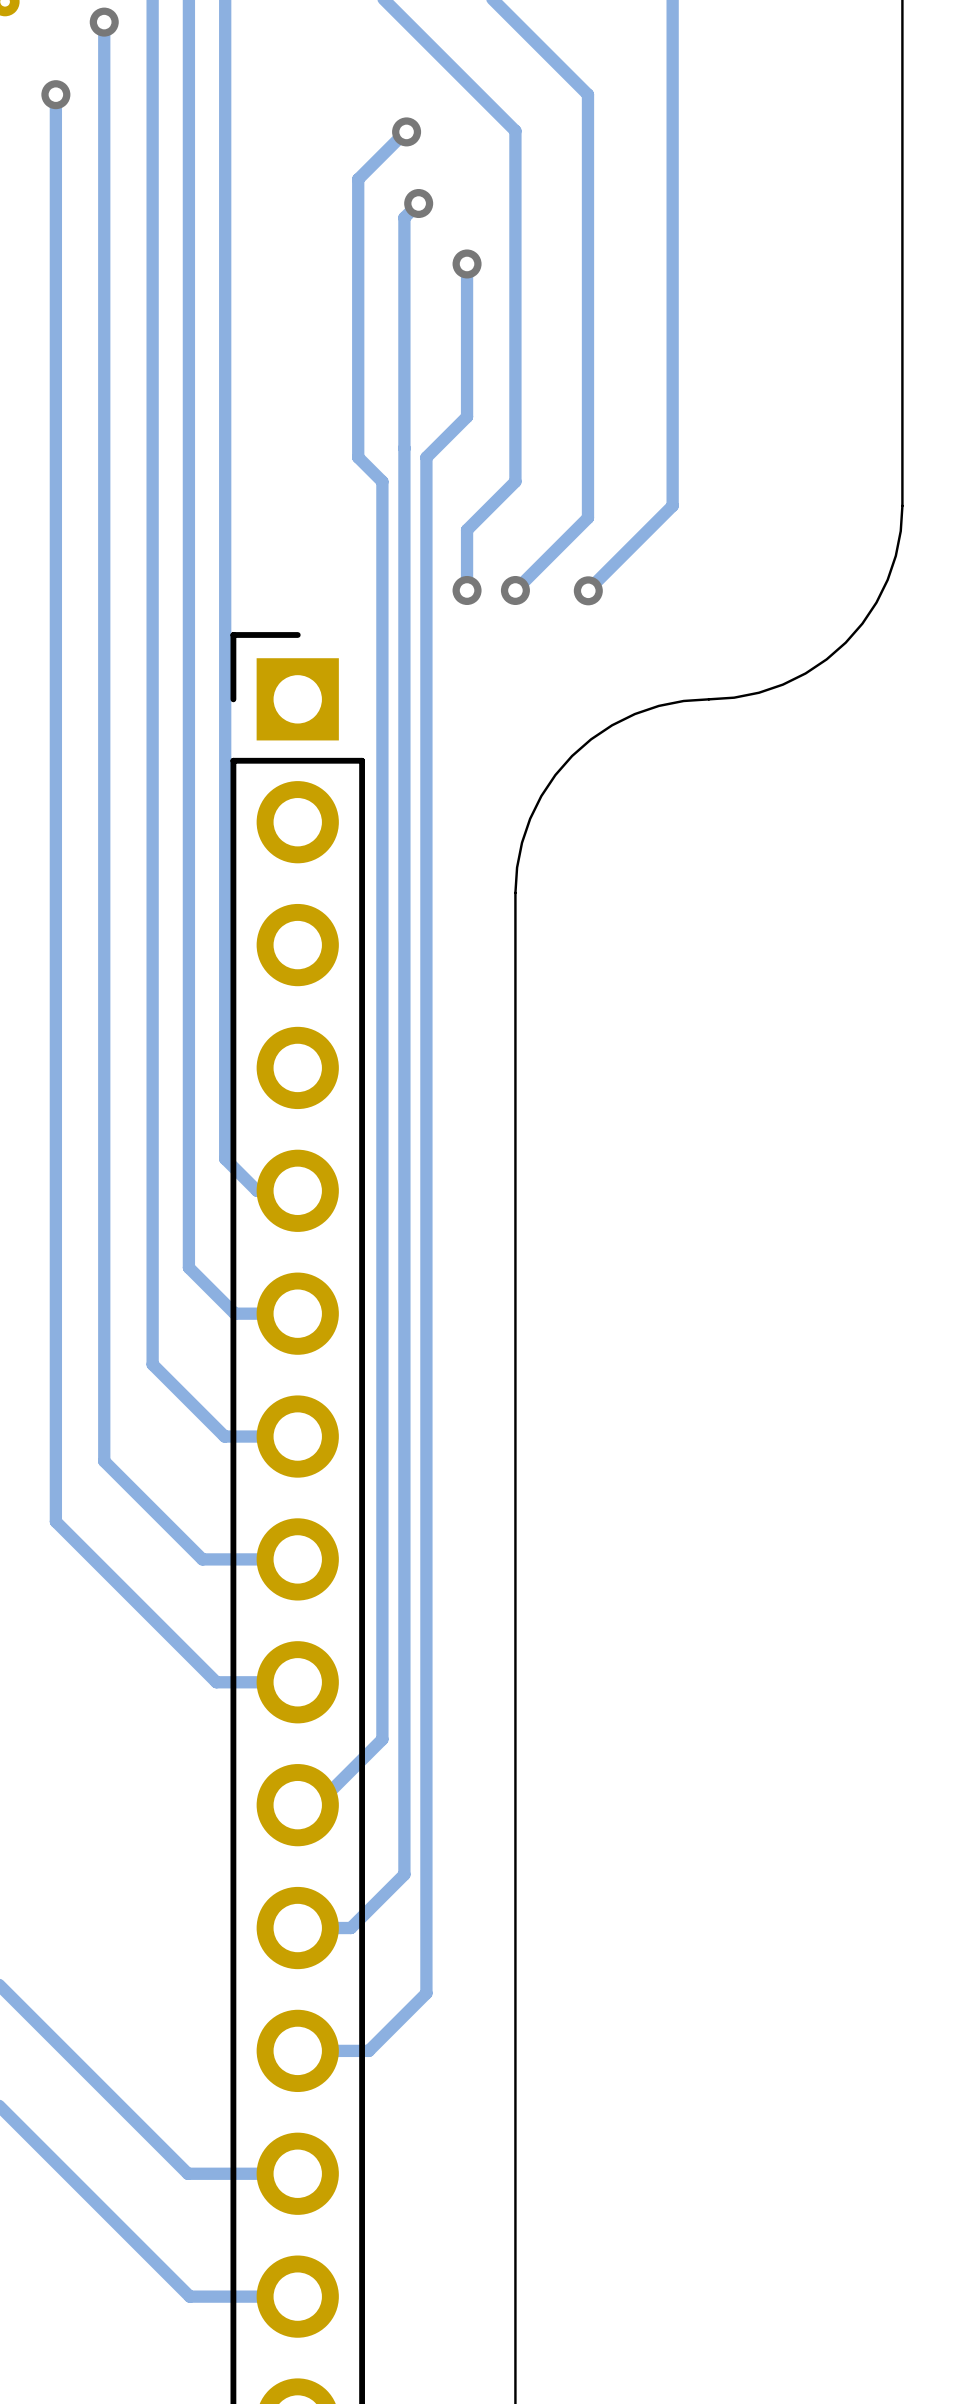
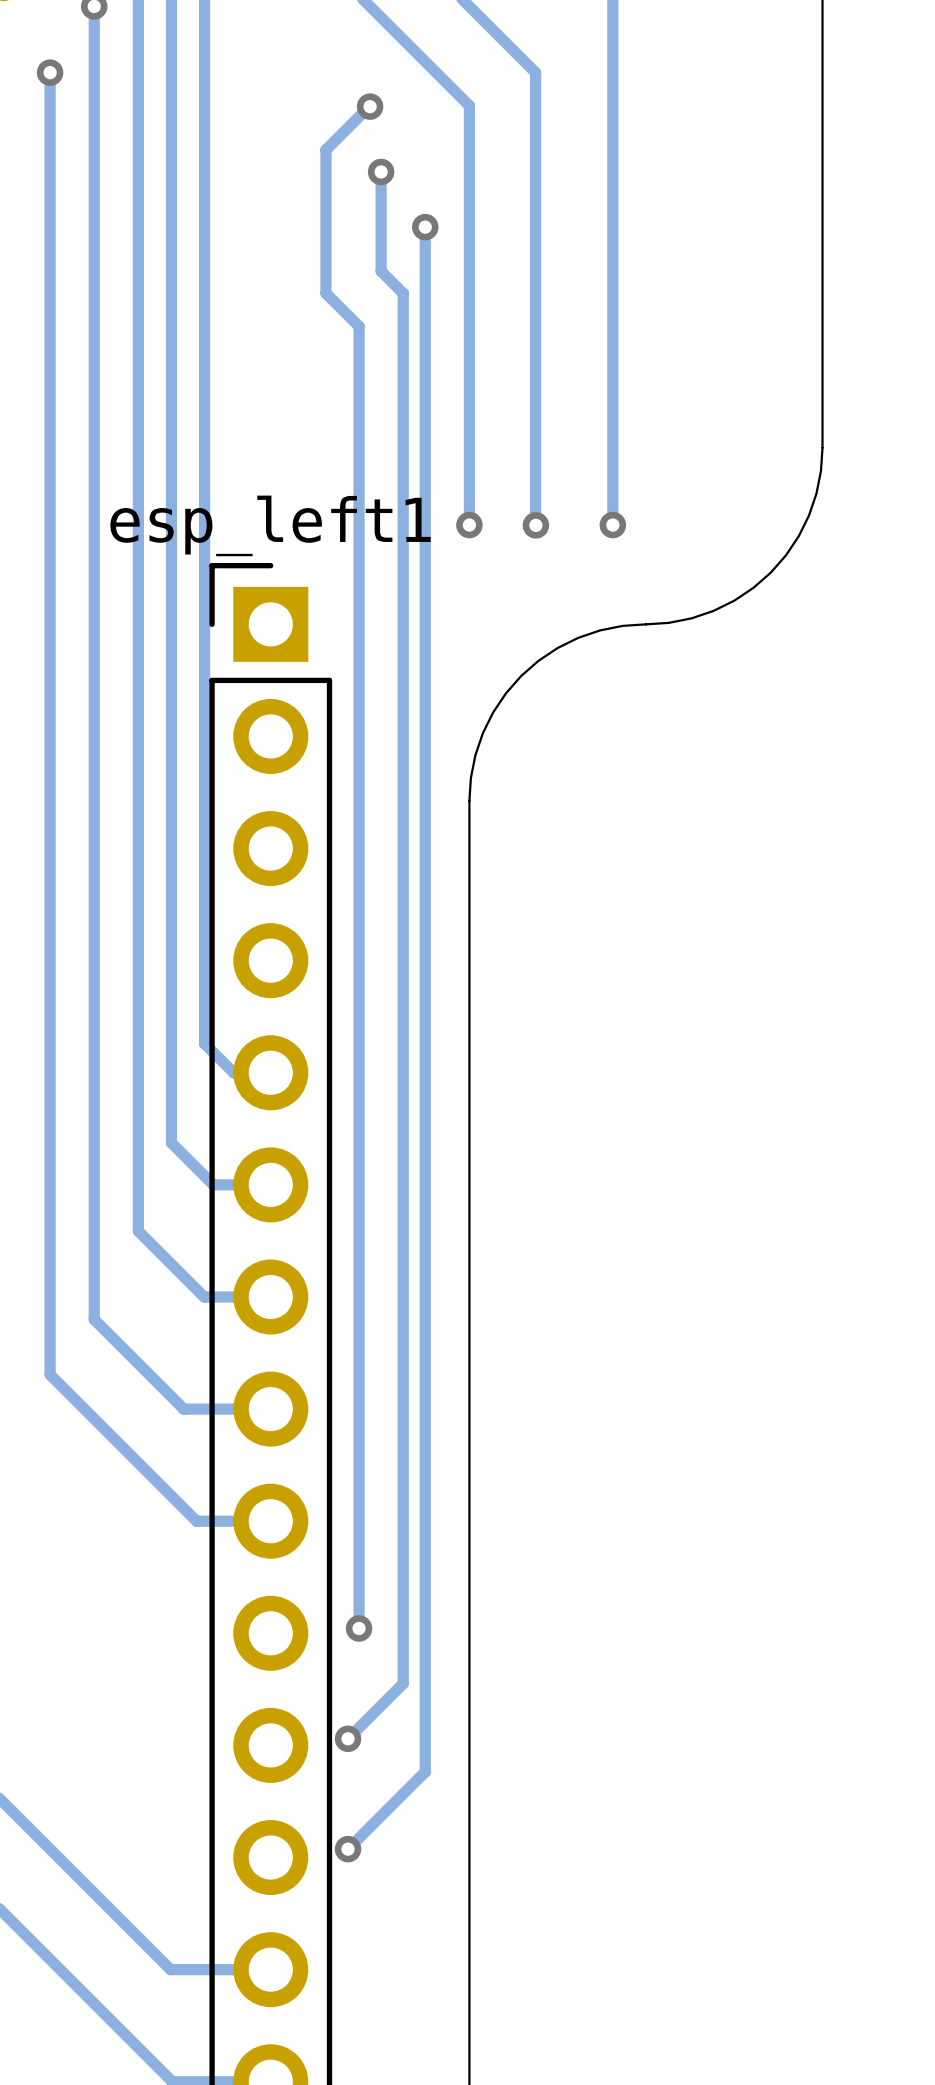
track: (418, 203) (404, 217) (404, 1874) (350, 1928) (297, 1928) -> (381, 171) (381, 271) (403, 293) (403, 1683) (348, 1738)
track: (358, 336) (358, 457) (382, 481) (382, 1739) (316, 1805) (297, 1805) -> (325, 293) (359, 326) (359, 1628)
track: (467, 416) (426, 457) (426, 1993) (368, 2050) (297, 2050) (306, 2041) -> (425, 366) (425, 469)
track: (515, 481) (467, 530) -> (469, 425) (469, 525)
track: (672, 505) (588, 590) -> (612, 447) (612, 525)
track: (587, 517) (515, 590) -> (535, 458) (535, 525)
track: none -> (425, 525) (425, 1771) (348, 1849)
via position: (467, 590) -> (612, 525)
esp_left1 name: none -> esp_left1 (270, 525)
via: none -> (359, 1628)
via: none -> (348, 1738)
via: none -> (348, 1849)

